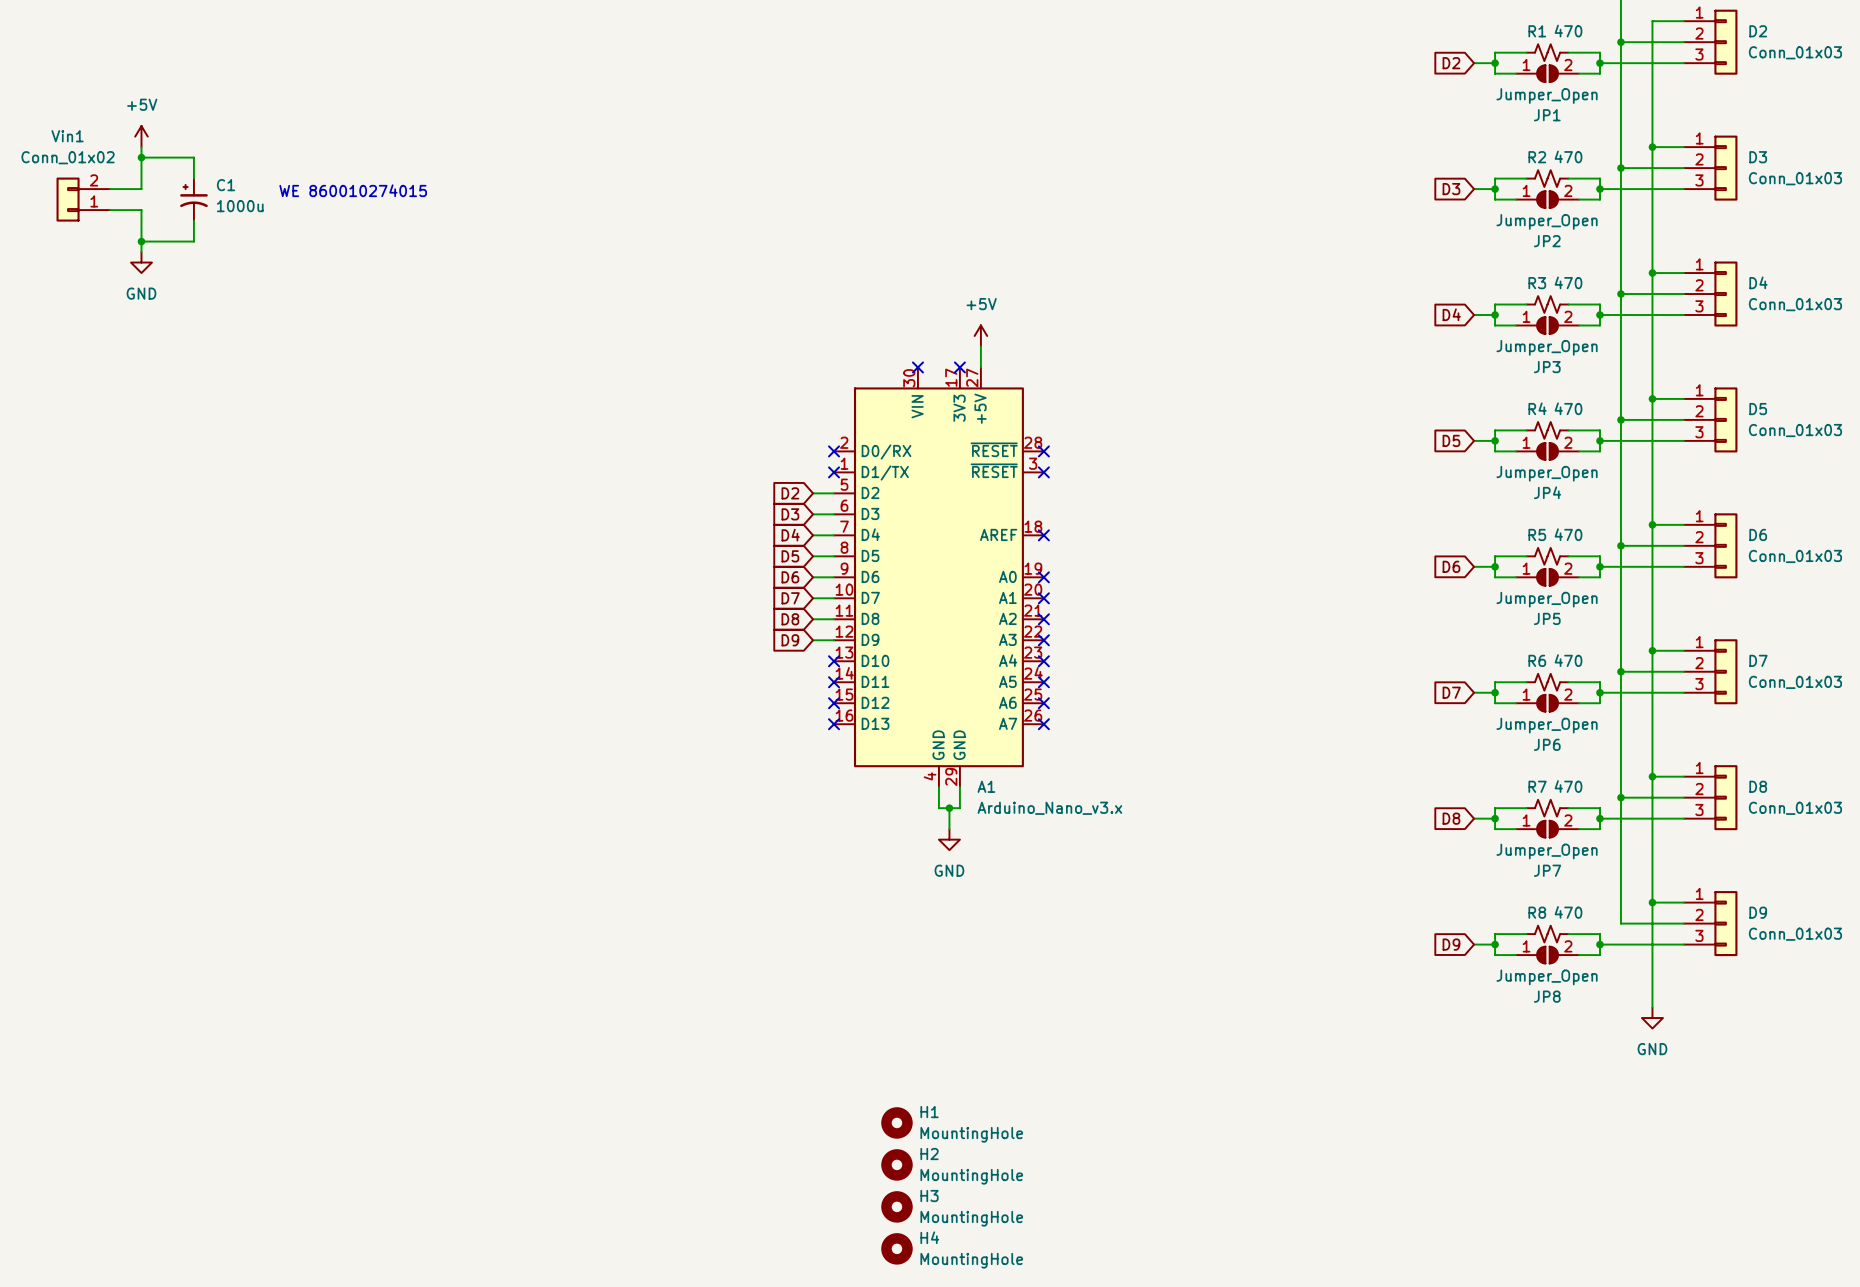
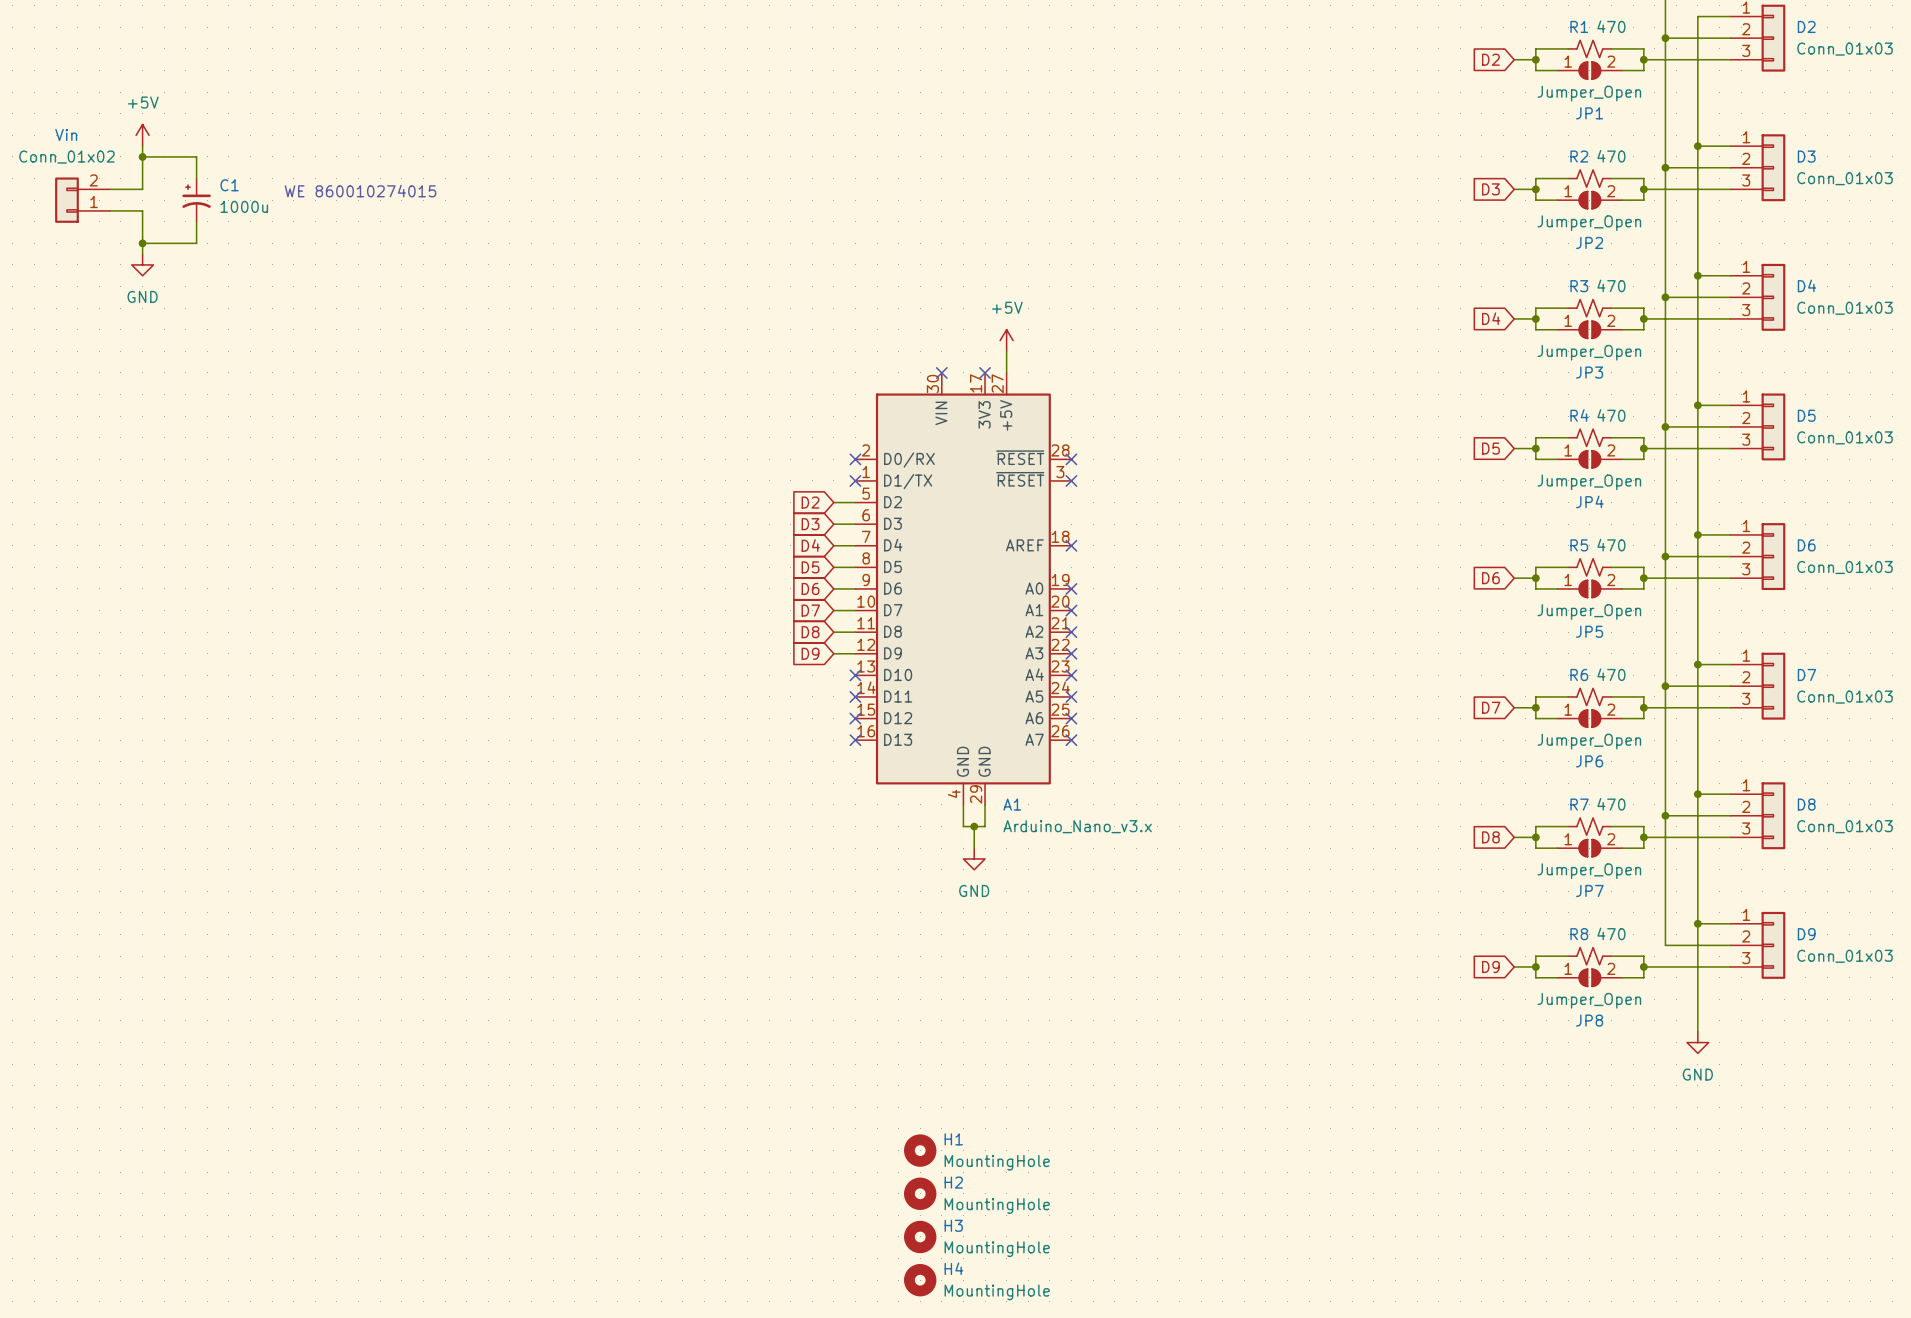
Vin1 name: Vin1 (67, 136) -> Vin (66, 134)

